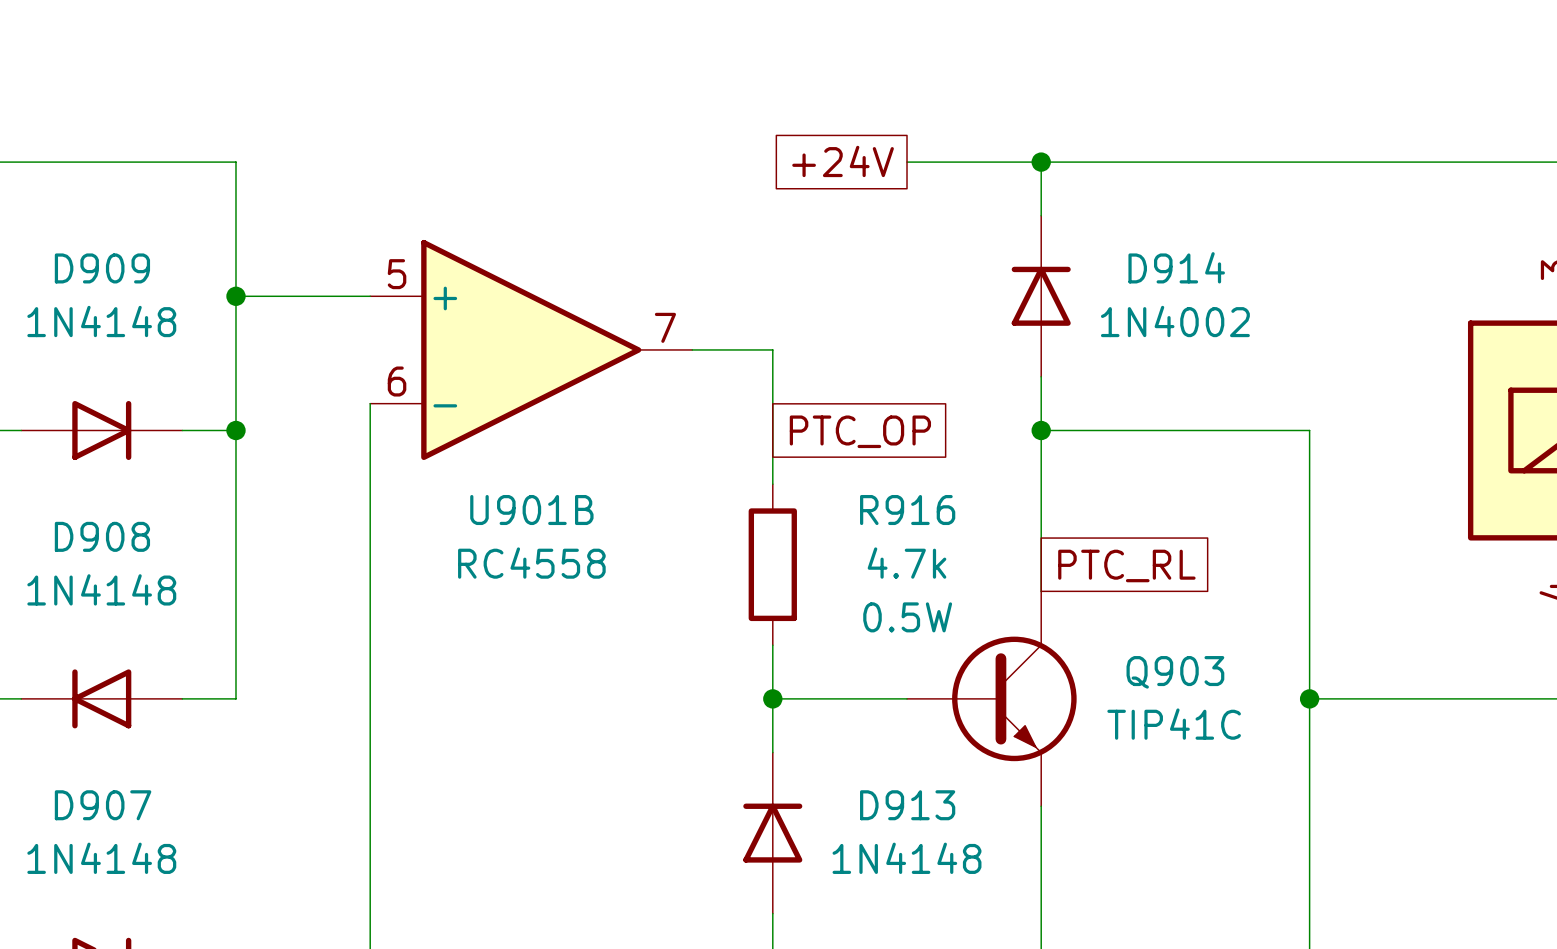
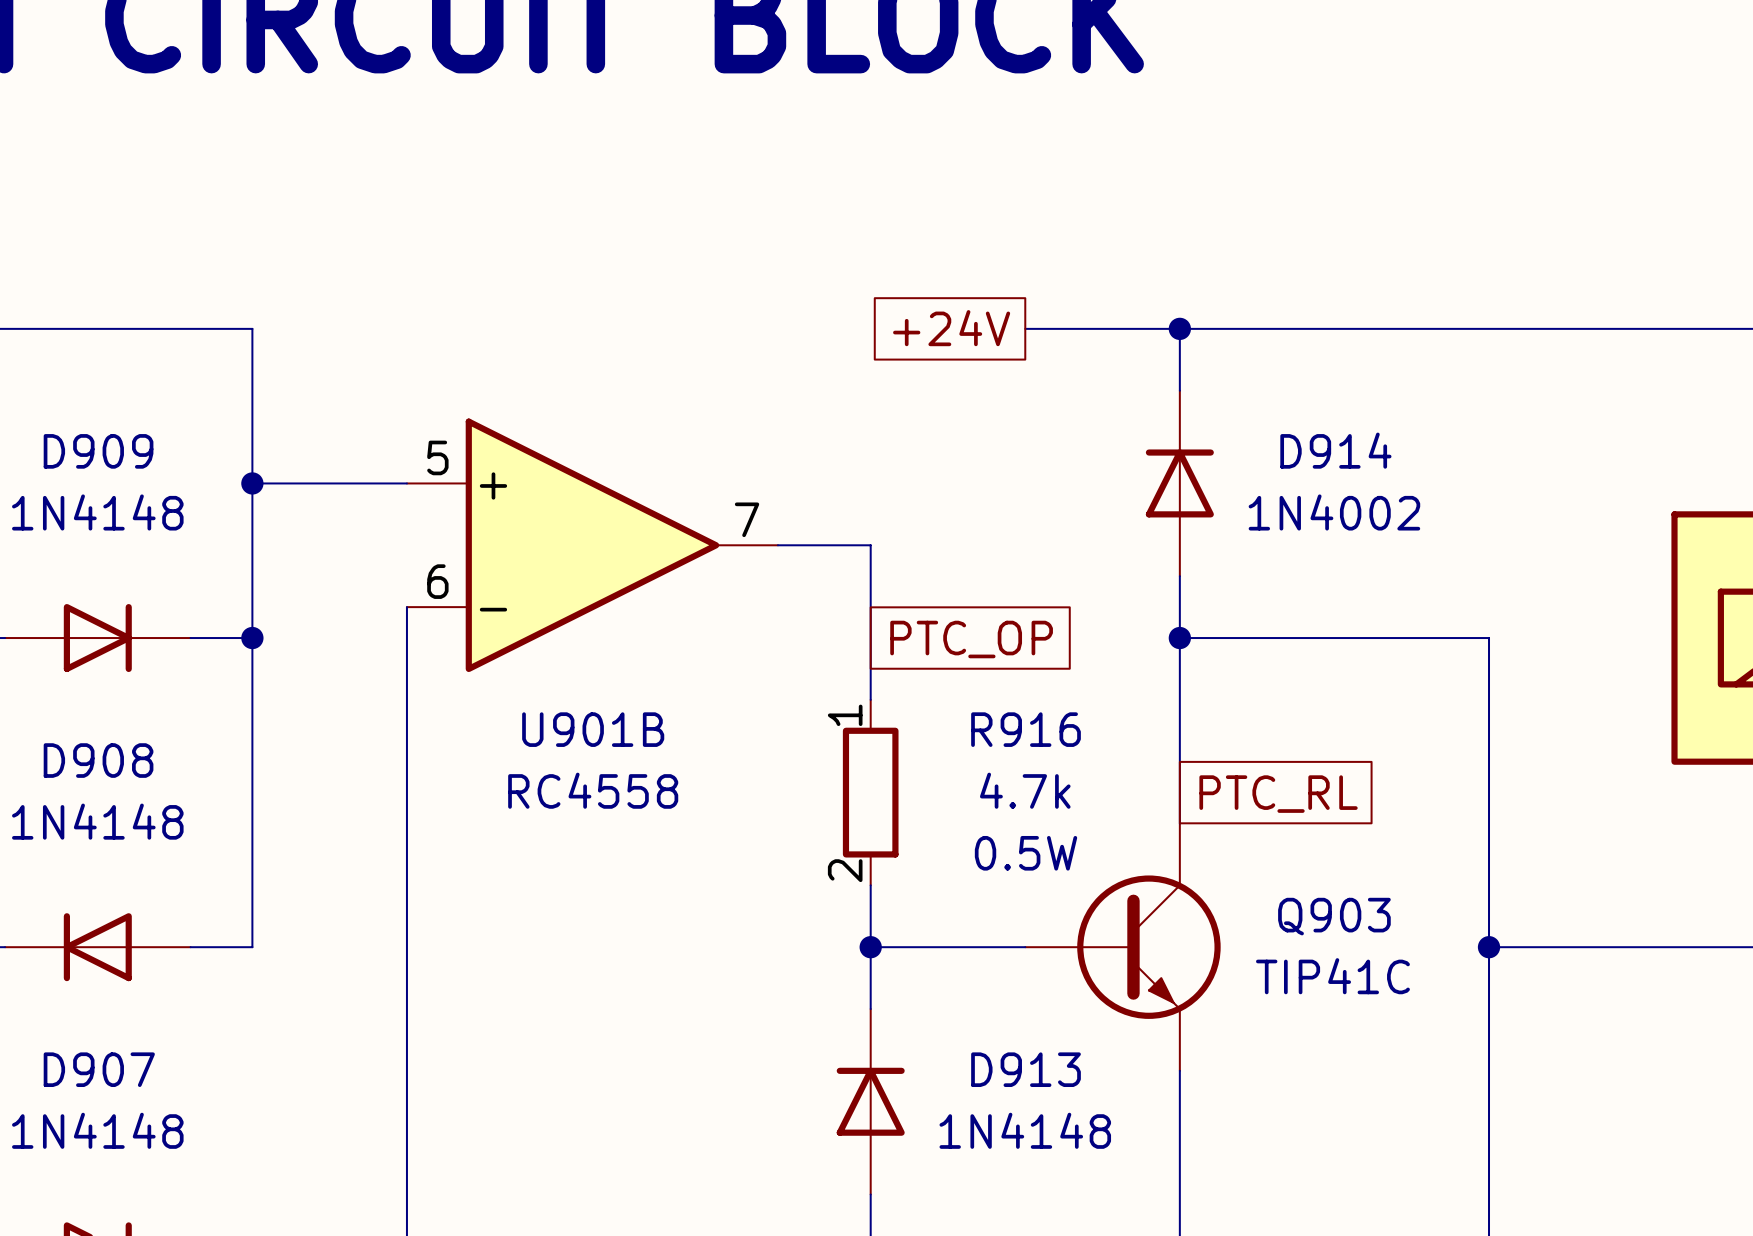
R916 pin number: none -> 1 (845, 715)
R916 pin number: none -> 2 (845, 870)

